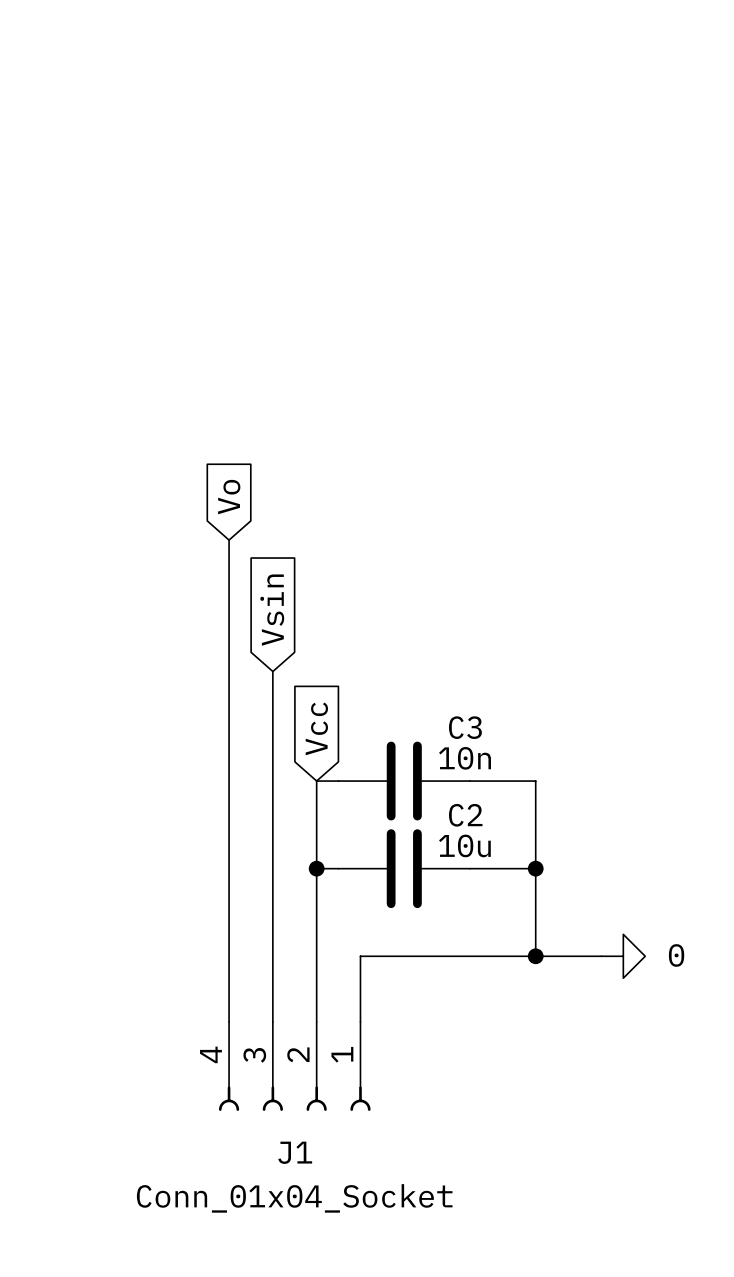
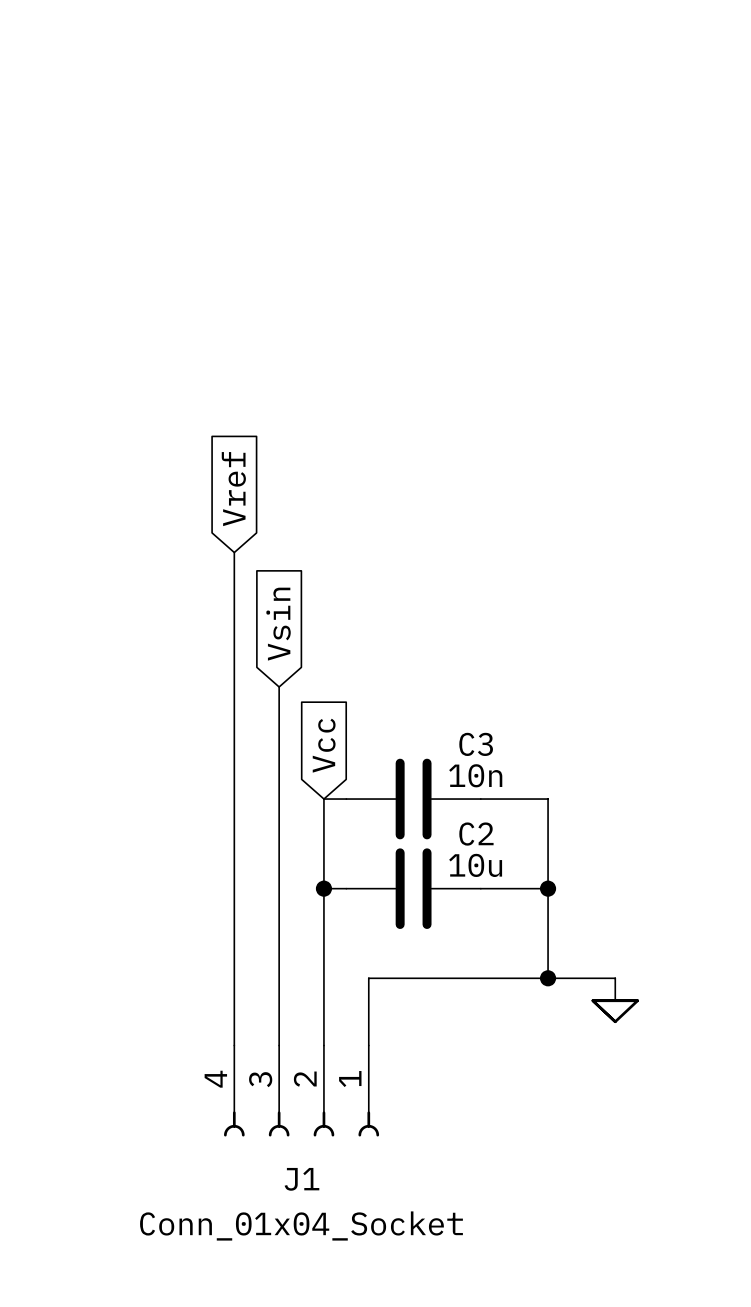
global label: Vo (229, 497) -> Vref (233, 489)
wire: none -> (615, 978) (615, 1000)
power symbol: 0 (623, 956) -> none
power symbol: none -> (615, 1011)

